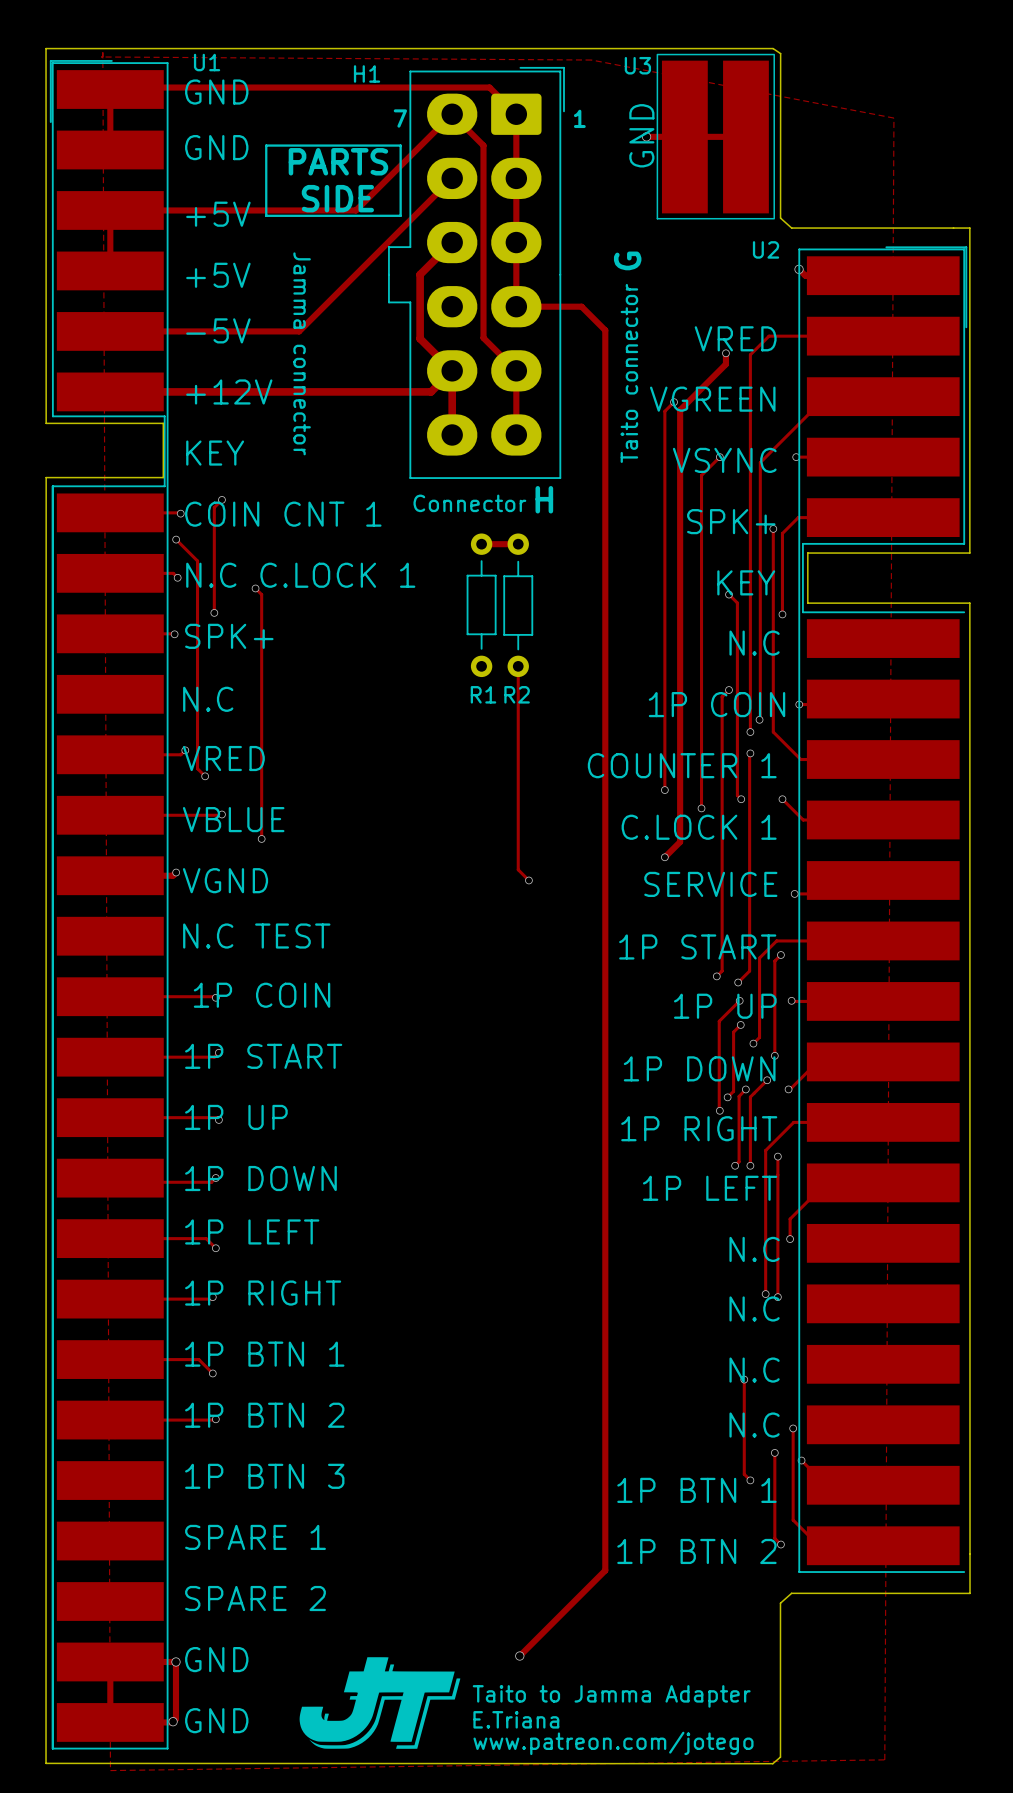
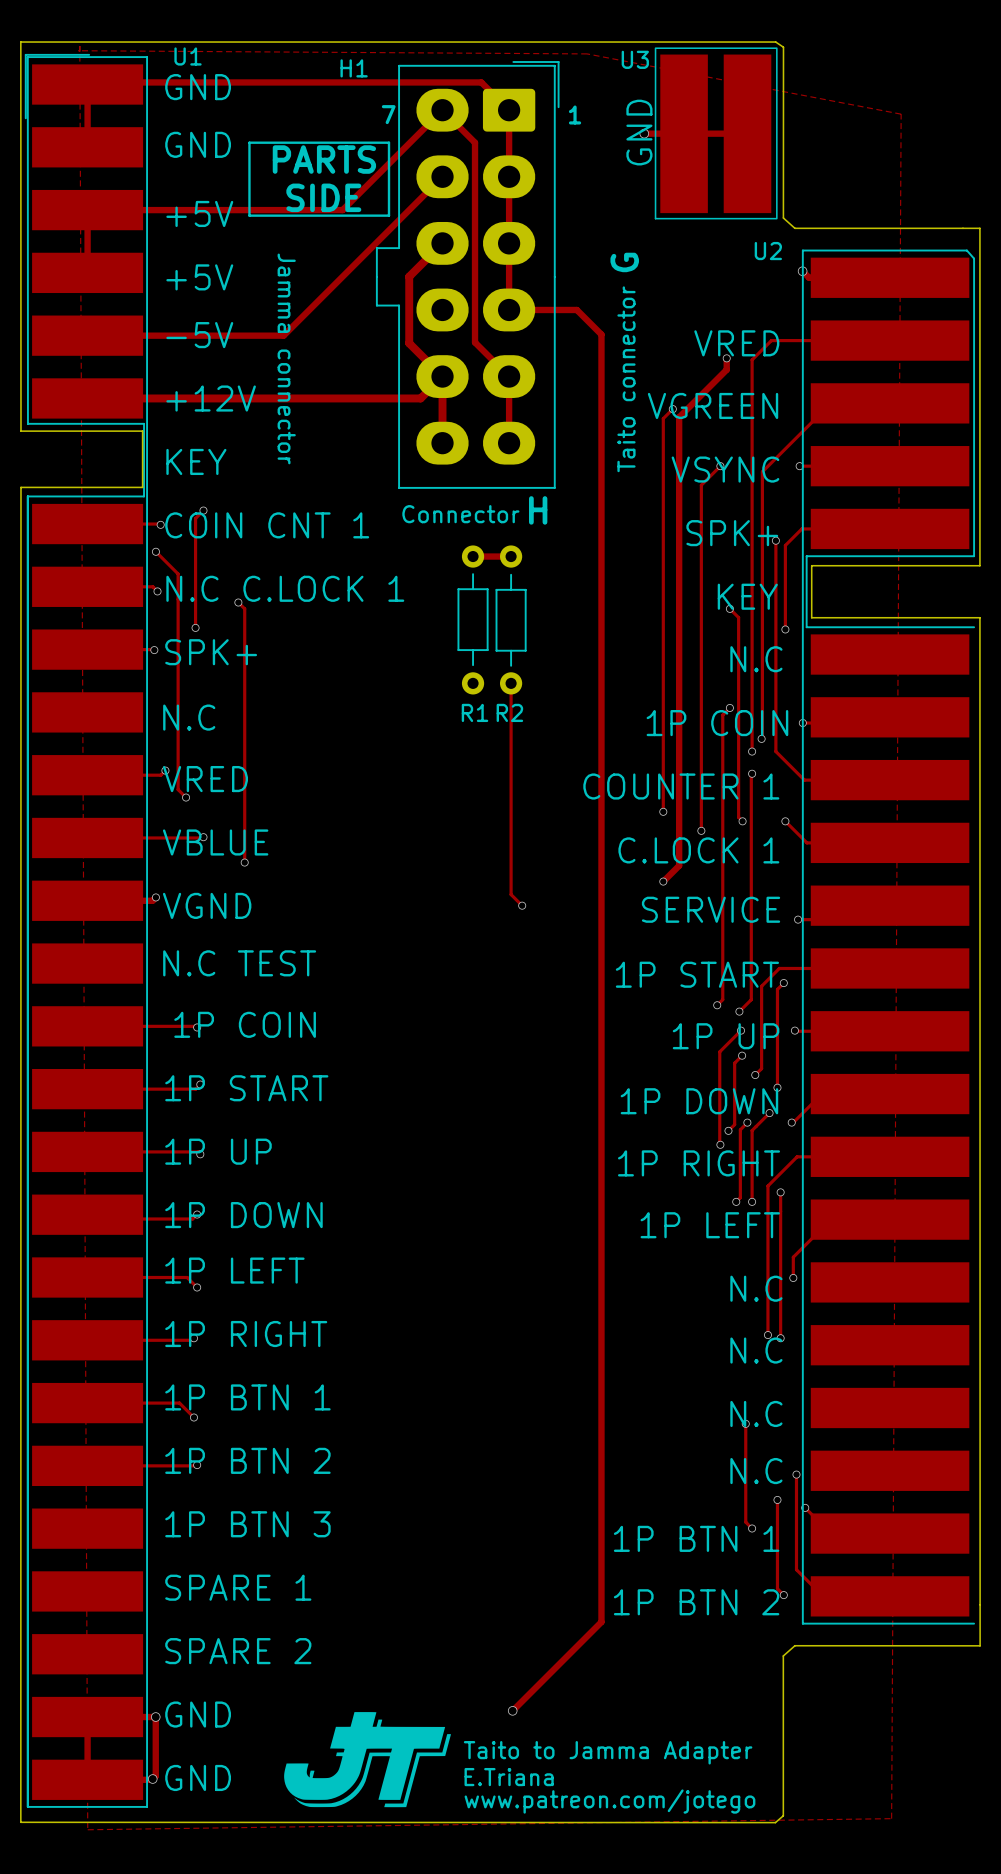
U2 footprint: [798, 246, 968, 1573] -> [801, 249, 976, 1625]

